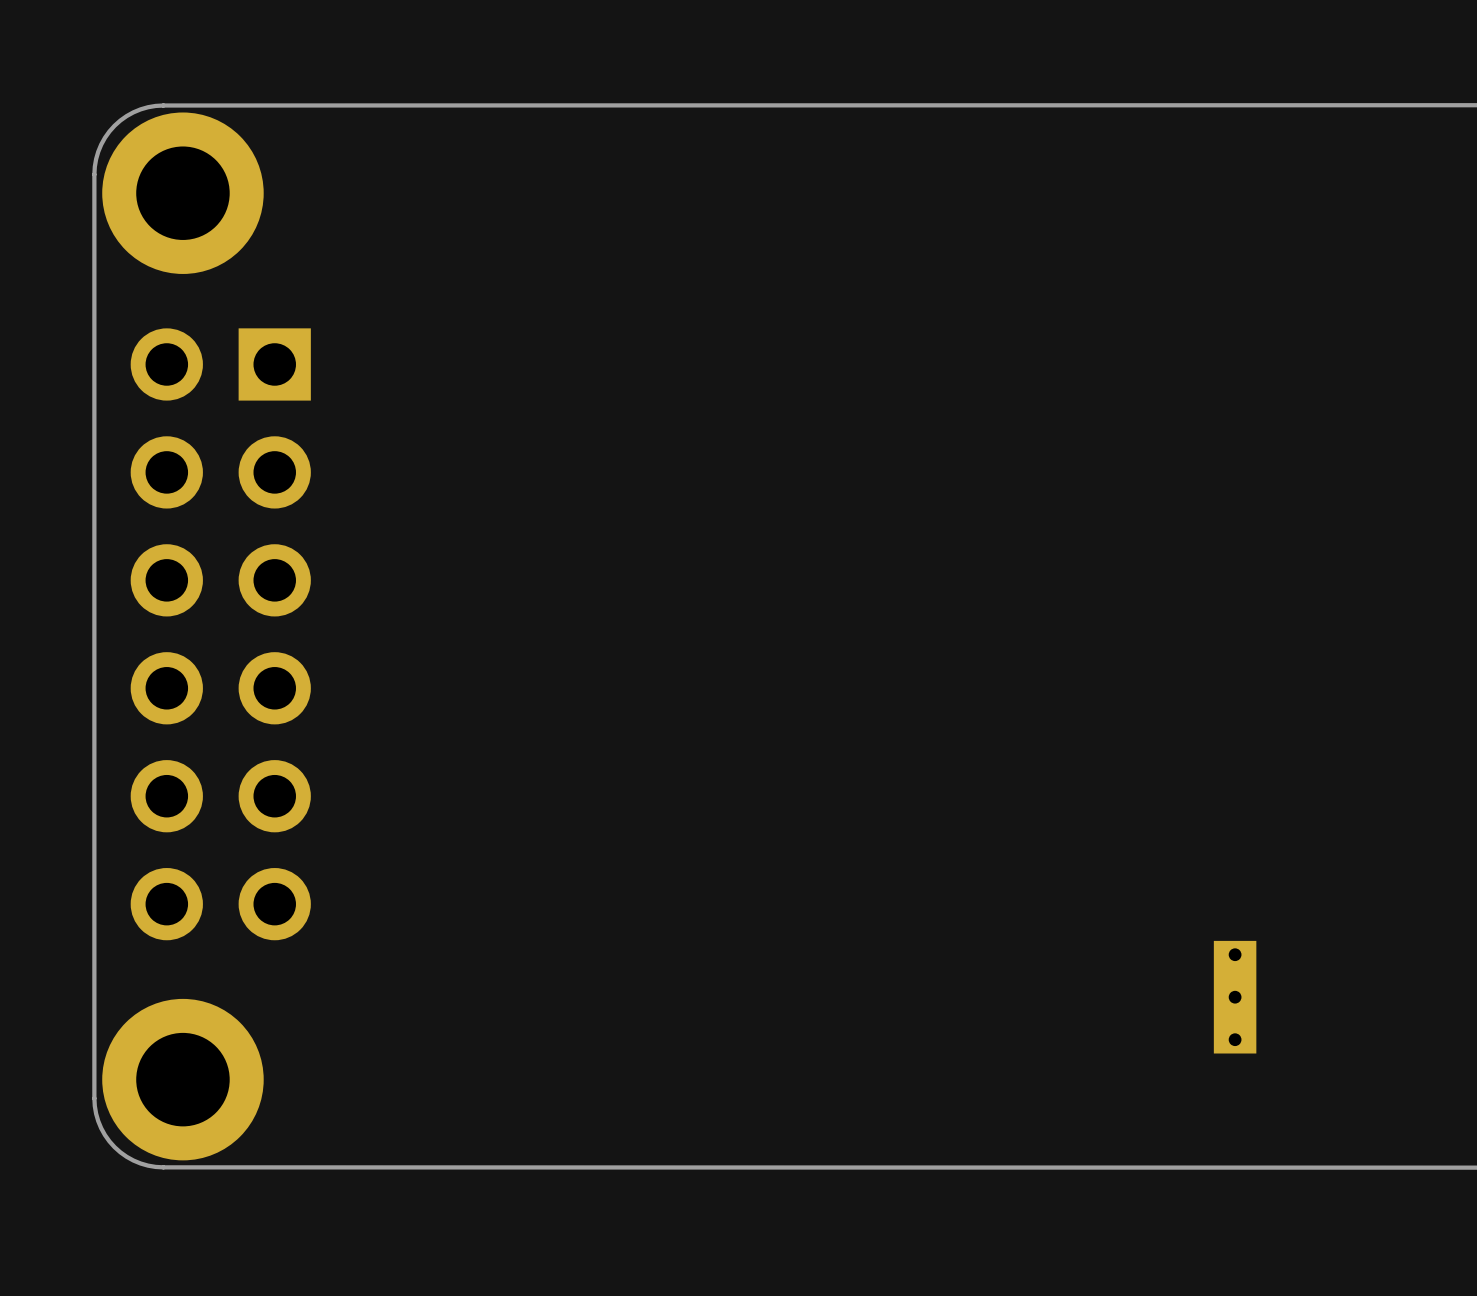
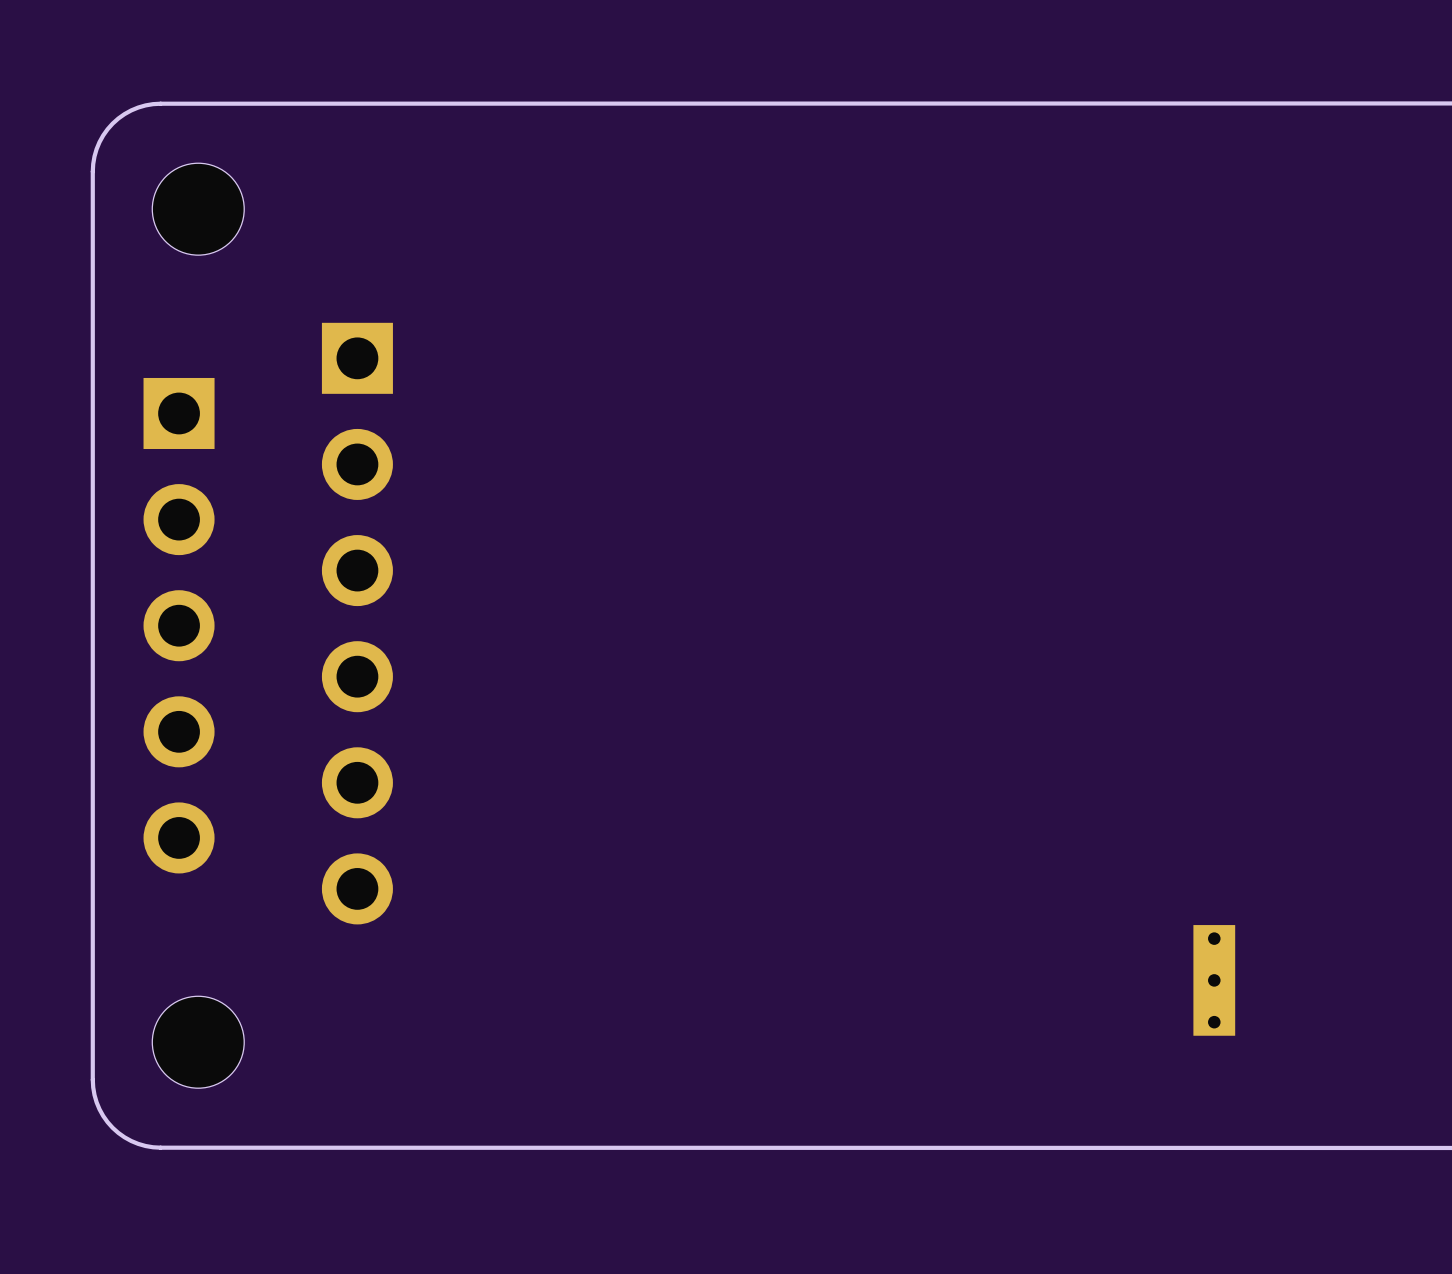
part footprint: [102, 112, 264, 274] -> [152, 163, 245, 256]
part footprint: [130, 328, 311, 941] -> [143, 377, 215, 874]
part: none -> (357, 623)
part footprint: [102, 998, 264, 1161] -> [152, 996, 245, 1089]

